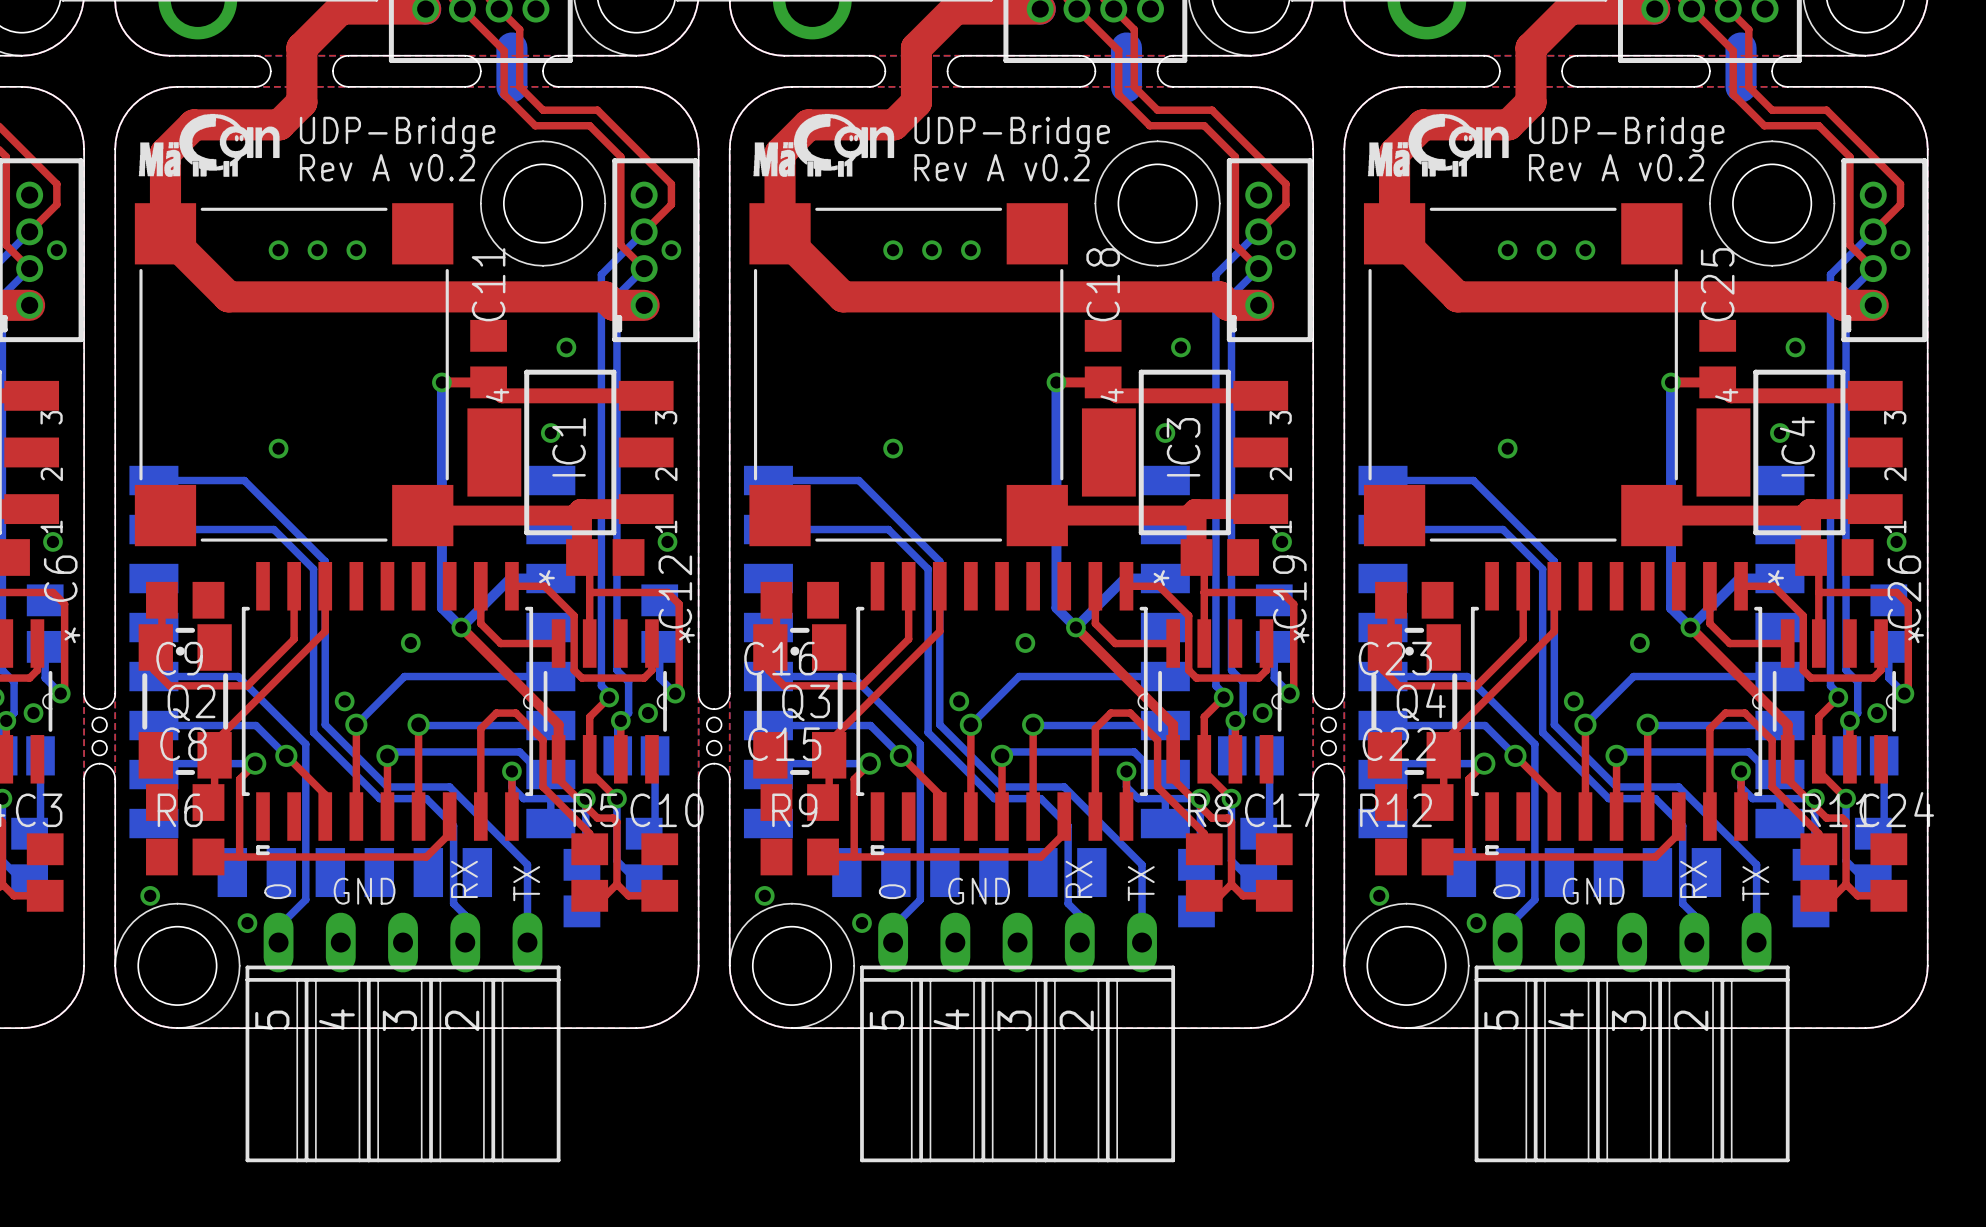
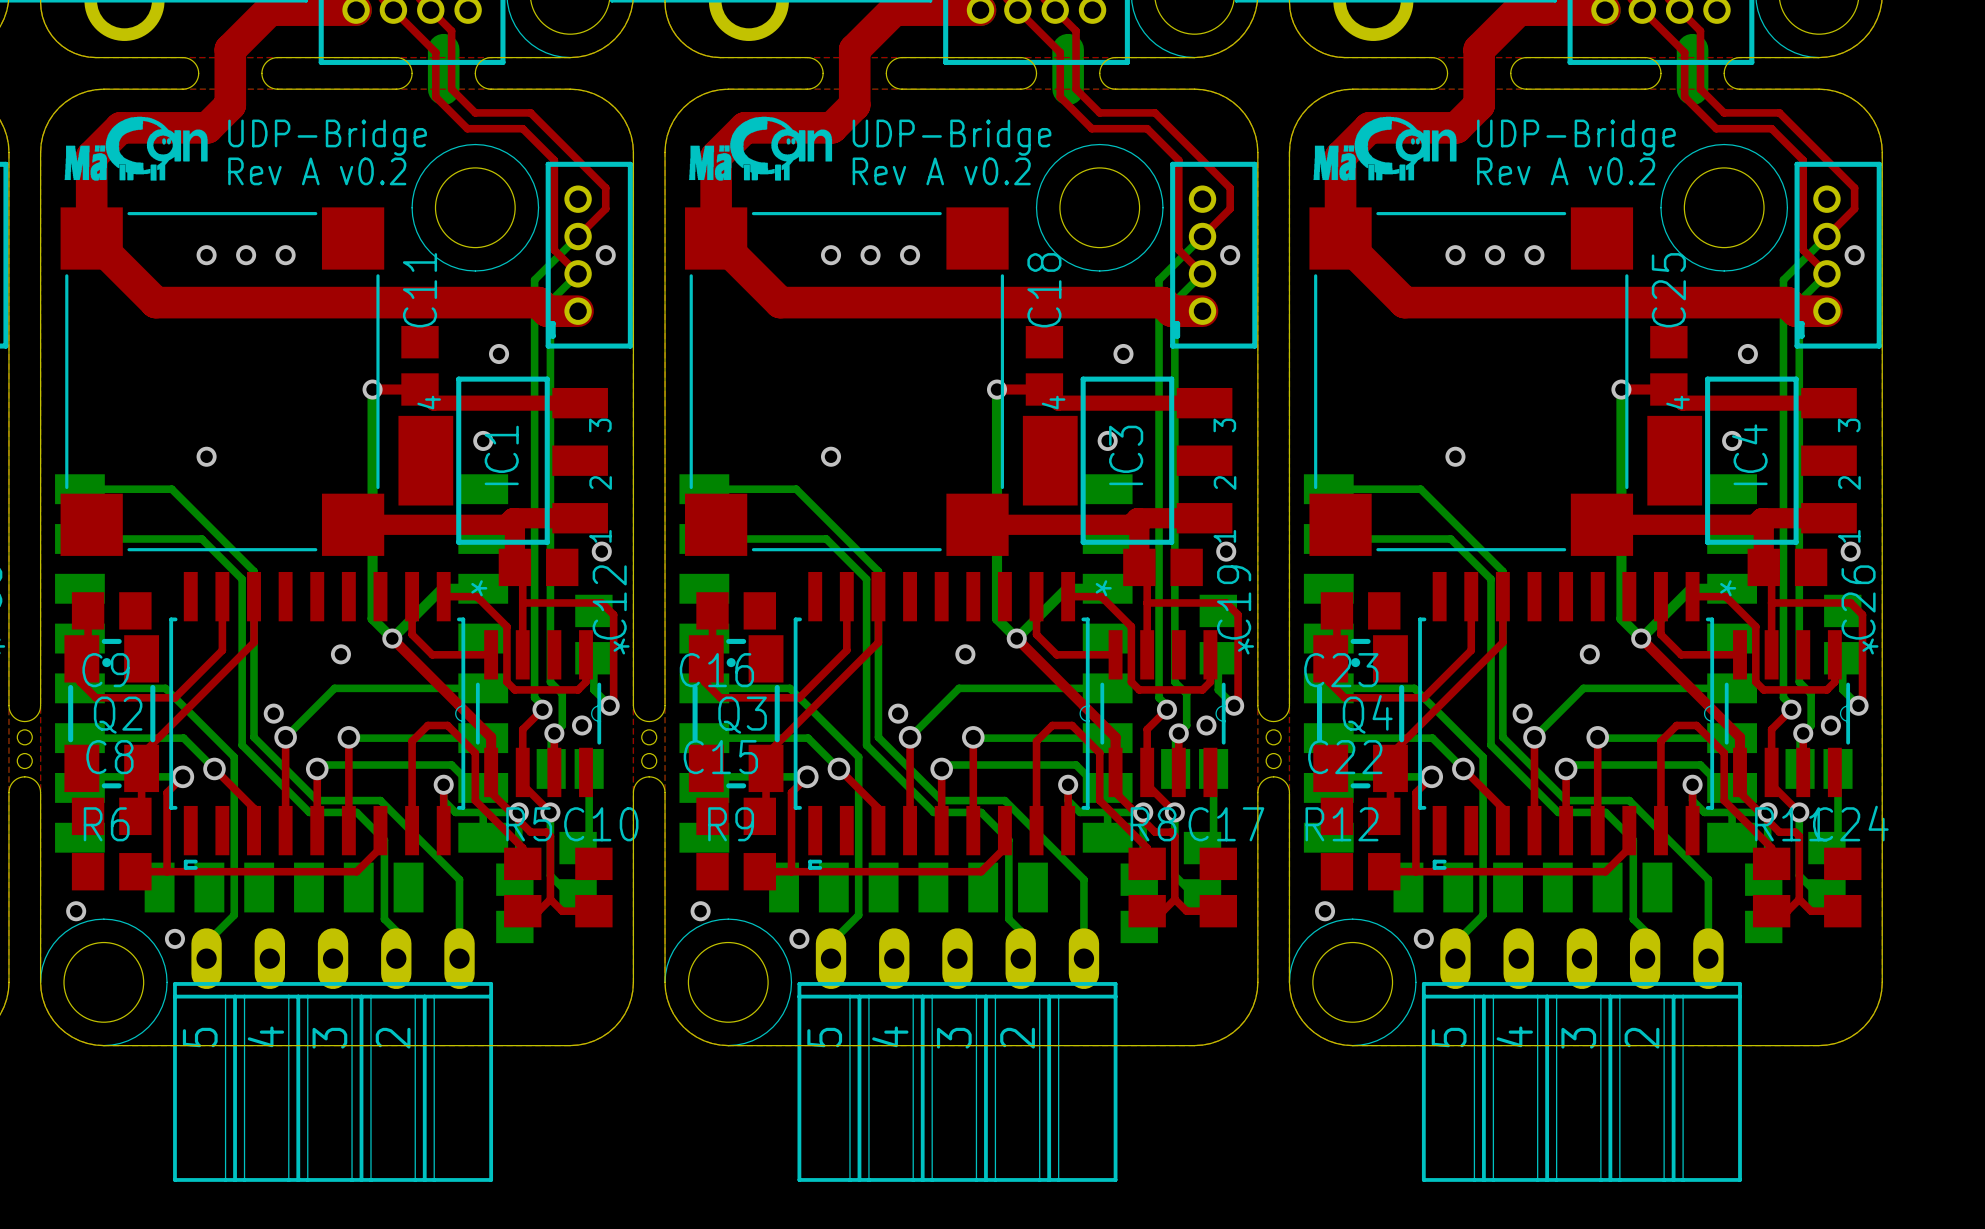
text: RX (464, 879) -> none
text: RX (1079, 879) -> none
text: RX (1693, 879) -> none
text: TX (526, 883) -> none
text: TX (1141, 883) -> none
text: TX (1755, 883) -> none
text: 0 (277, 891) -> none
text: GND (364, 891) -> none
text: 0 (892, 891) -> none
text: GND (979, 891) -> none
text: 0 (1506, 891) -> none
text: GND (1593, 891) -> none

